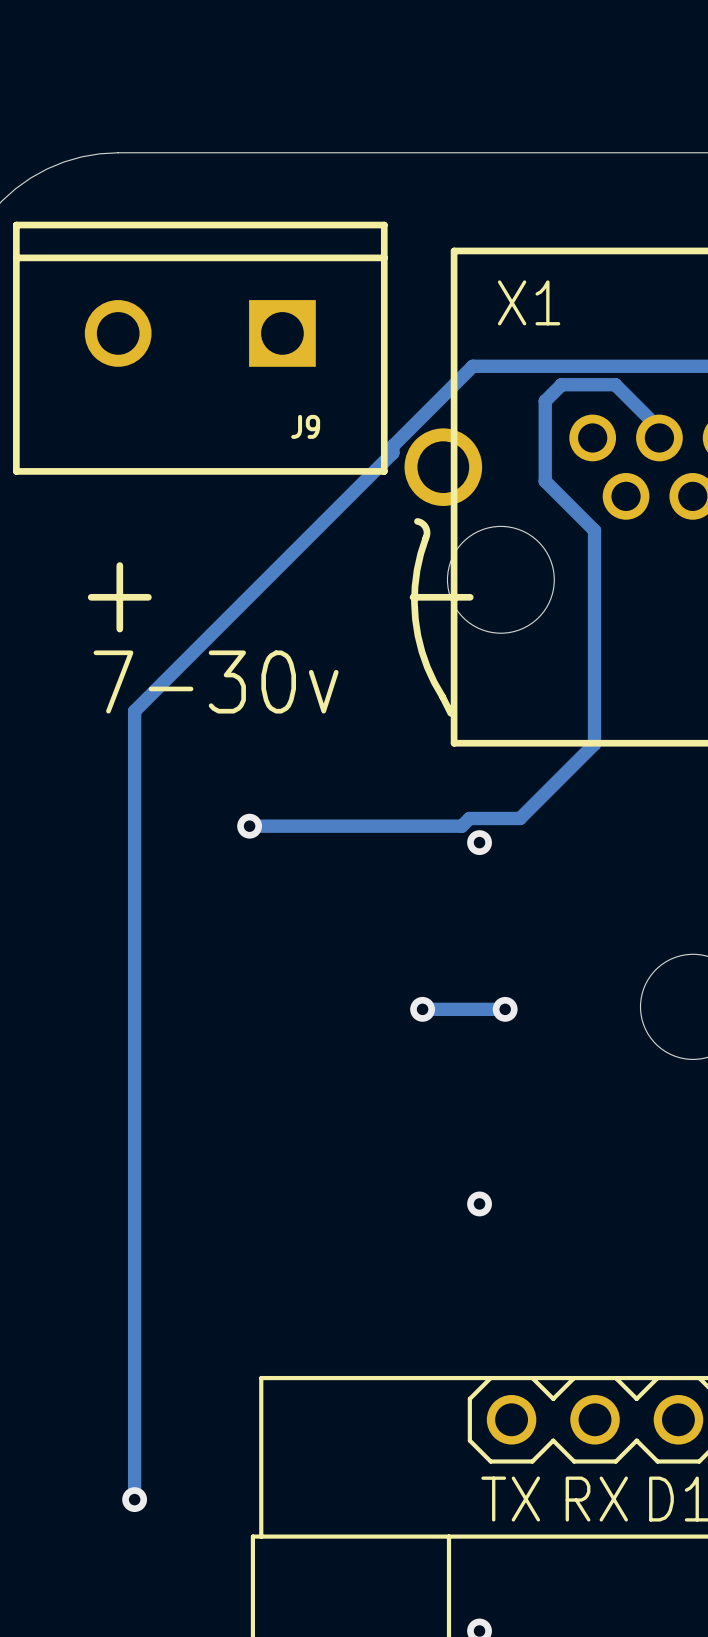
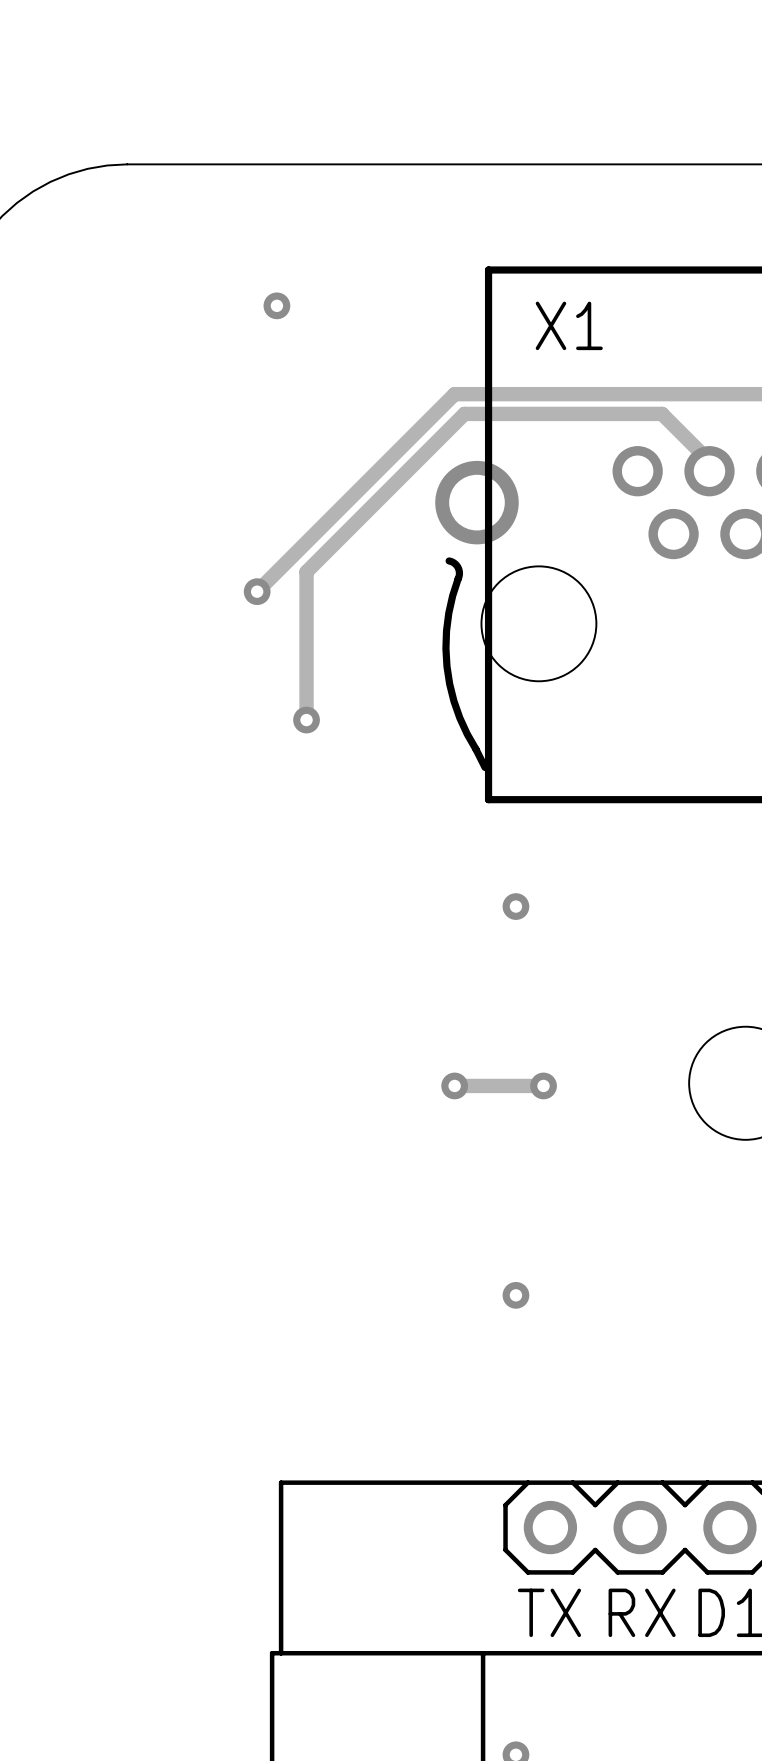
via: none -> (276, 305)
J9: (200, 348) -> none
track: (472, 366) (392, 446) (392, 452) (134, 711) (134, 1499) -> (508, 394) (454, 394) (257, 591)
track: (561, 384) (545, 401) (545, 481) (594, 530) (594, 744) (520, 818) (469, 818) (461, 826) (249, 826) -> (604, 413) (464, 413) (306, 571) (306, 720)
via: none -> (257, 591)
text: + - (280, 597) -> none
via: none -> (306, 720)
text: 7-30v (216, 682) -> none
via: (249, 826) -> none
via: (134, 1499) -> none

